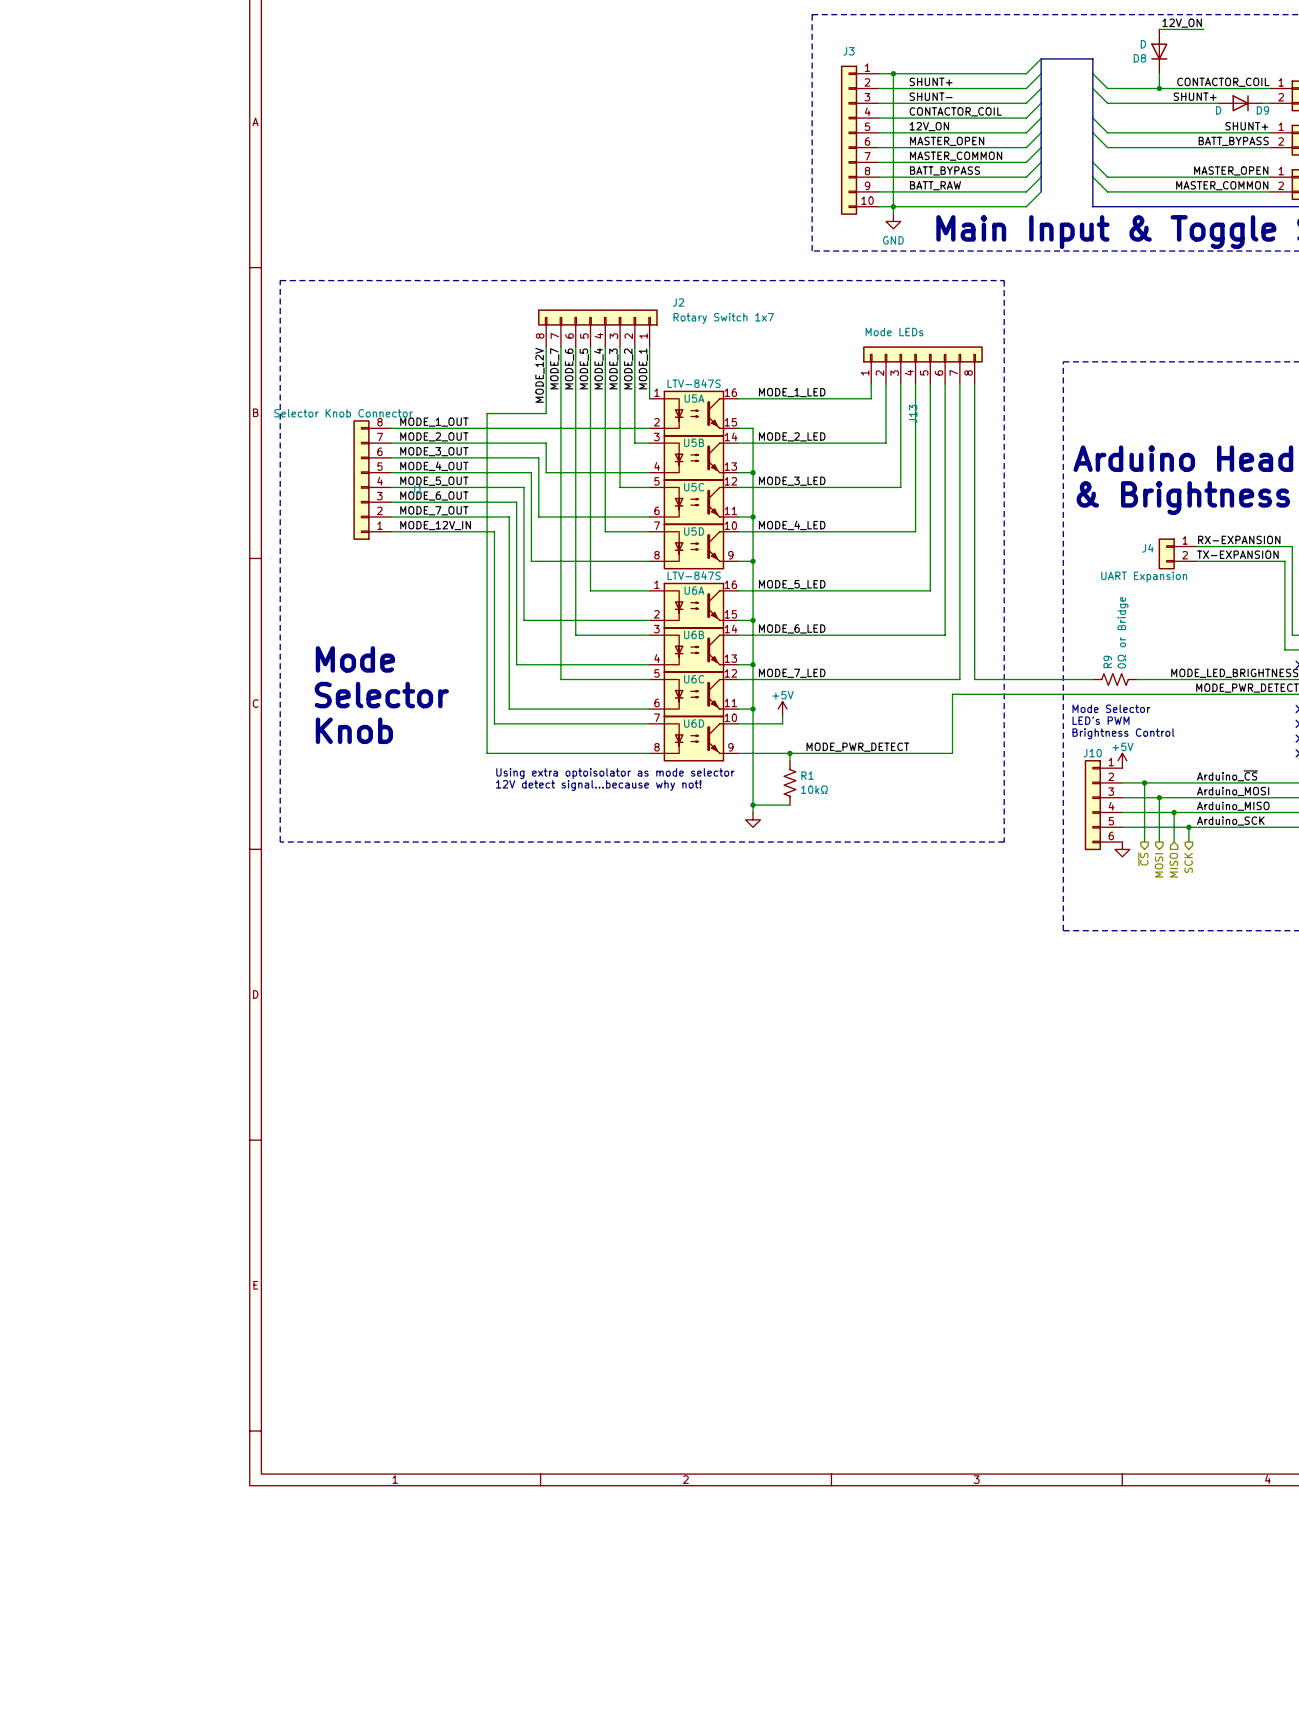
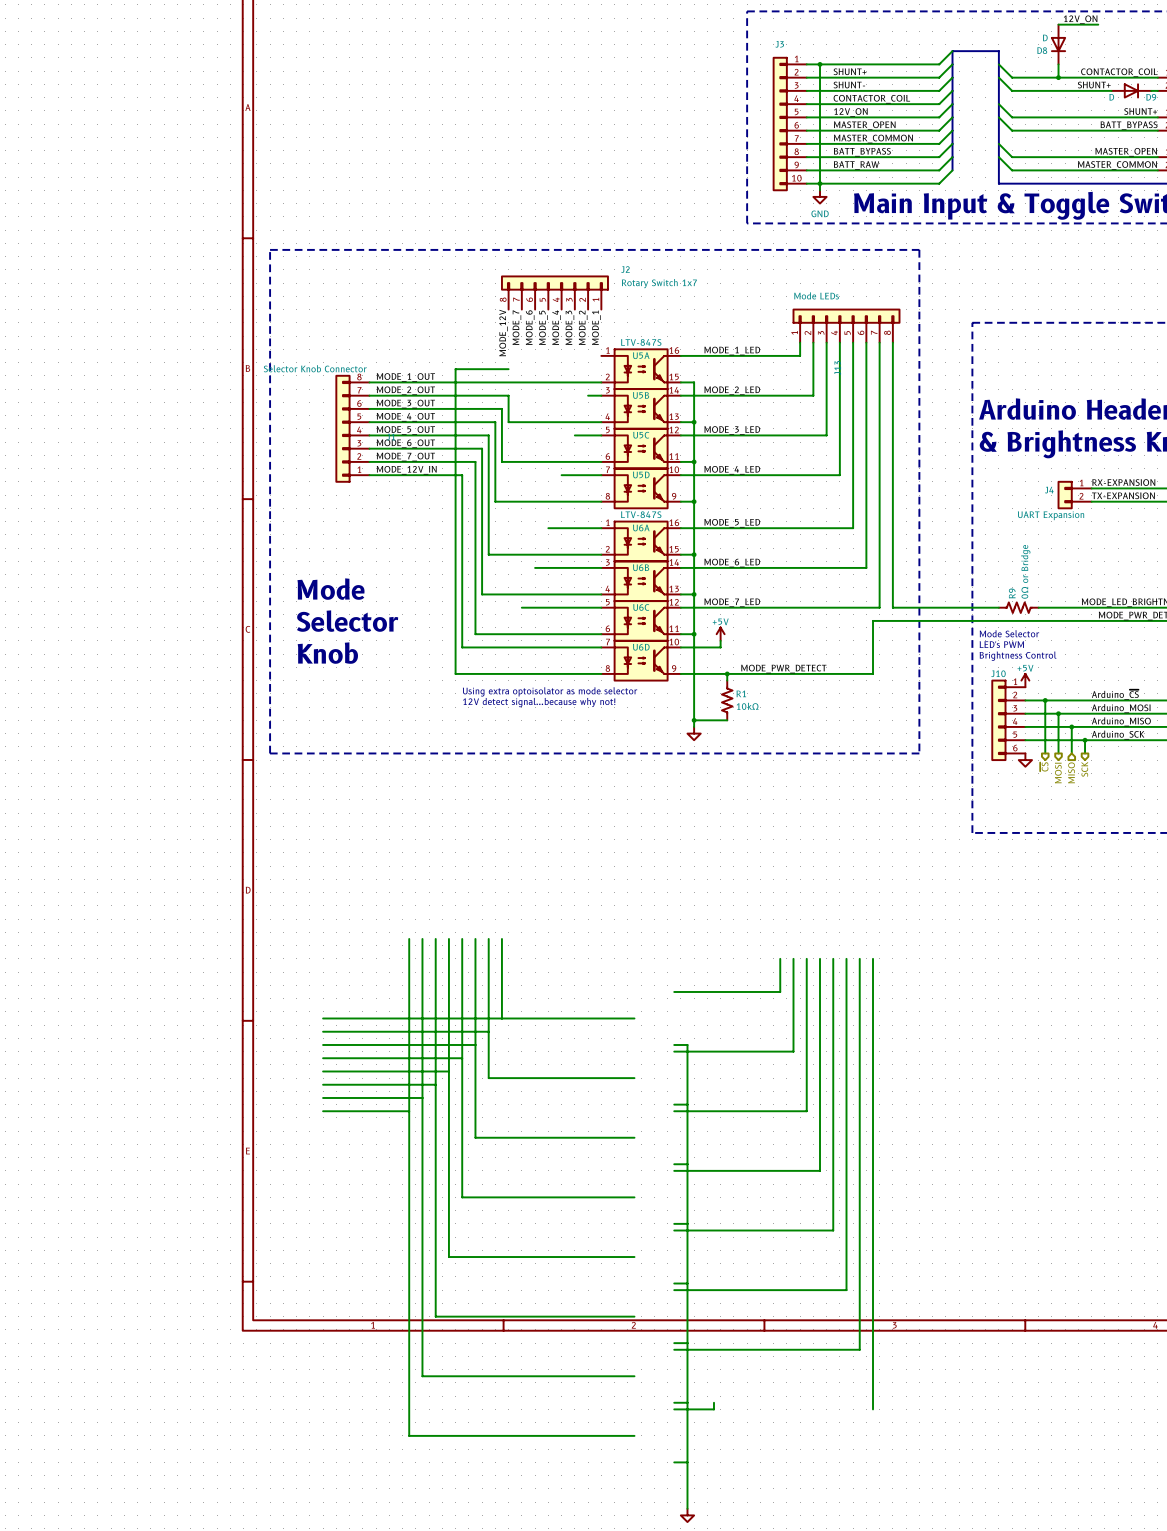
wire: (546, 347) (546, 413) -> none
wire: (560, 347) (560, 679) -> none
wire: (575, 347) (575, 635) -> none
wire: (590, 347) (590, 590) -> none
wire: (605, 347) (605, 531) -> none
wire: (620, 347) (620, 487) -> none
wire: (634, 347) (634, 443) -> none
wire: (649, 347) (649, 398) -> none
wire: none -> (409, 938) (409, 1435) (634, 1435)
wire: none -> (422, 938) (422, 1376) (634, 1376)
wire: none -> (435, 938) (435, 1316) (634, 1316)
wire: none -> (448, 938) (448, 1257) (634, 1257)
wire: none -> (462, 938) (462, 1197) (634, 1197)
wire: none -> (475, 938) (475, 1137) (634, 1137)
wire: none -> (488, 938) (488, 1078) (634, 1078)
wire: none -> (501, 938) (501, 1018)
wire: none -> (780, 958) (780, 991) (674, 991)
wire: none -> (793, 958) (793, 1051) (674, 1051)
wire: none -> (806, 958) (806, 1111) (674, 1111)
wire: none -> (820, 958) (820, 1170) (674, 1170)
wire: none -> (833, 958) (833, 1230) (674, 1230)
wire: none -> (846, 958) (846, 1290) (674, 1290)
wire: none -> (859, 958) (859, 1349) (674, 1349)
wire: none -> (873, 958) (873, 1409)
wire: none -> (323, 1018) (634, 1018)
wire: none -> (323, 1031) (488, 1031)
wire: none -> (323, 1044) (475, 1044)
wire: none -> (674, 1044) (687, 1044) (687, 1508)
wire: none -> (323, 1058) (462, 1058)
wire: none -> (323, 1071) (448, 1071)
wire: none -> (323, 1084) (435, 1084)
wire: none -> (323, 1097) (422, 1097)
wire: none -> (674, 1104) (687, 1104)
wire: none -> (323, 1111) (409, 1111)
wire: none -> (674, 1164) (687, 1164)
wire: none -> (674, 1223) (687, 1223)
wire: none -> (674, 1283) (687, 1283)
wire: none -> (674, 1343) (687, 1343)
wire: none -> (674, 1402) (687, 1402)
wire: none -> (713, 1402) (713, 1409) (674, 1409)
wire: none -> (674, 1462) (687, 1462)
power symbol: none -> (687, 1515)

